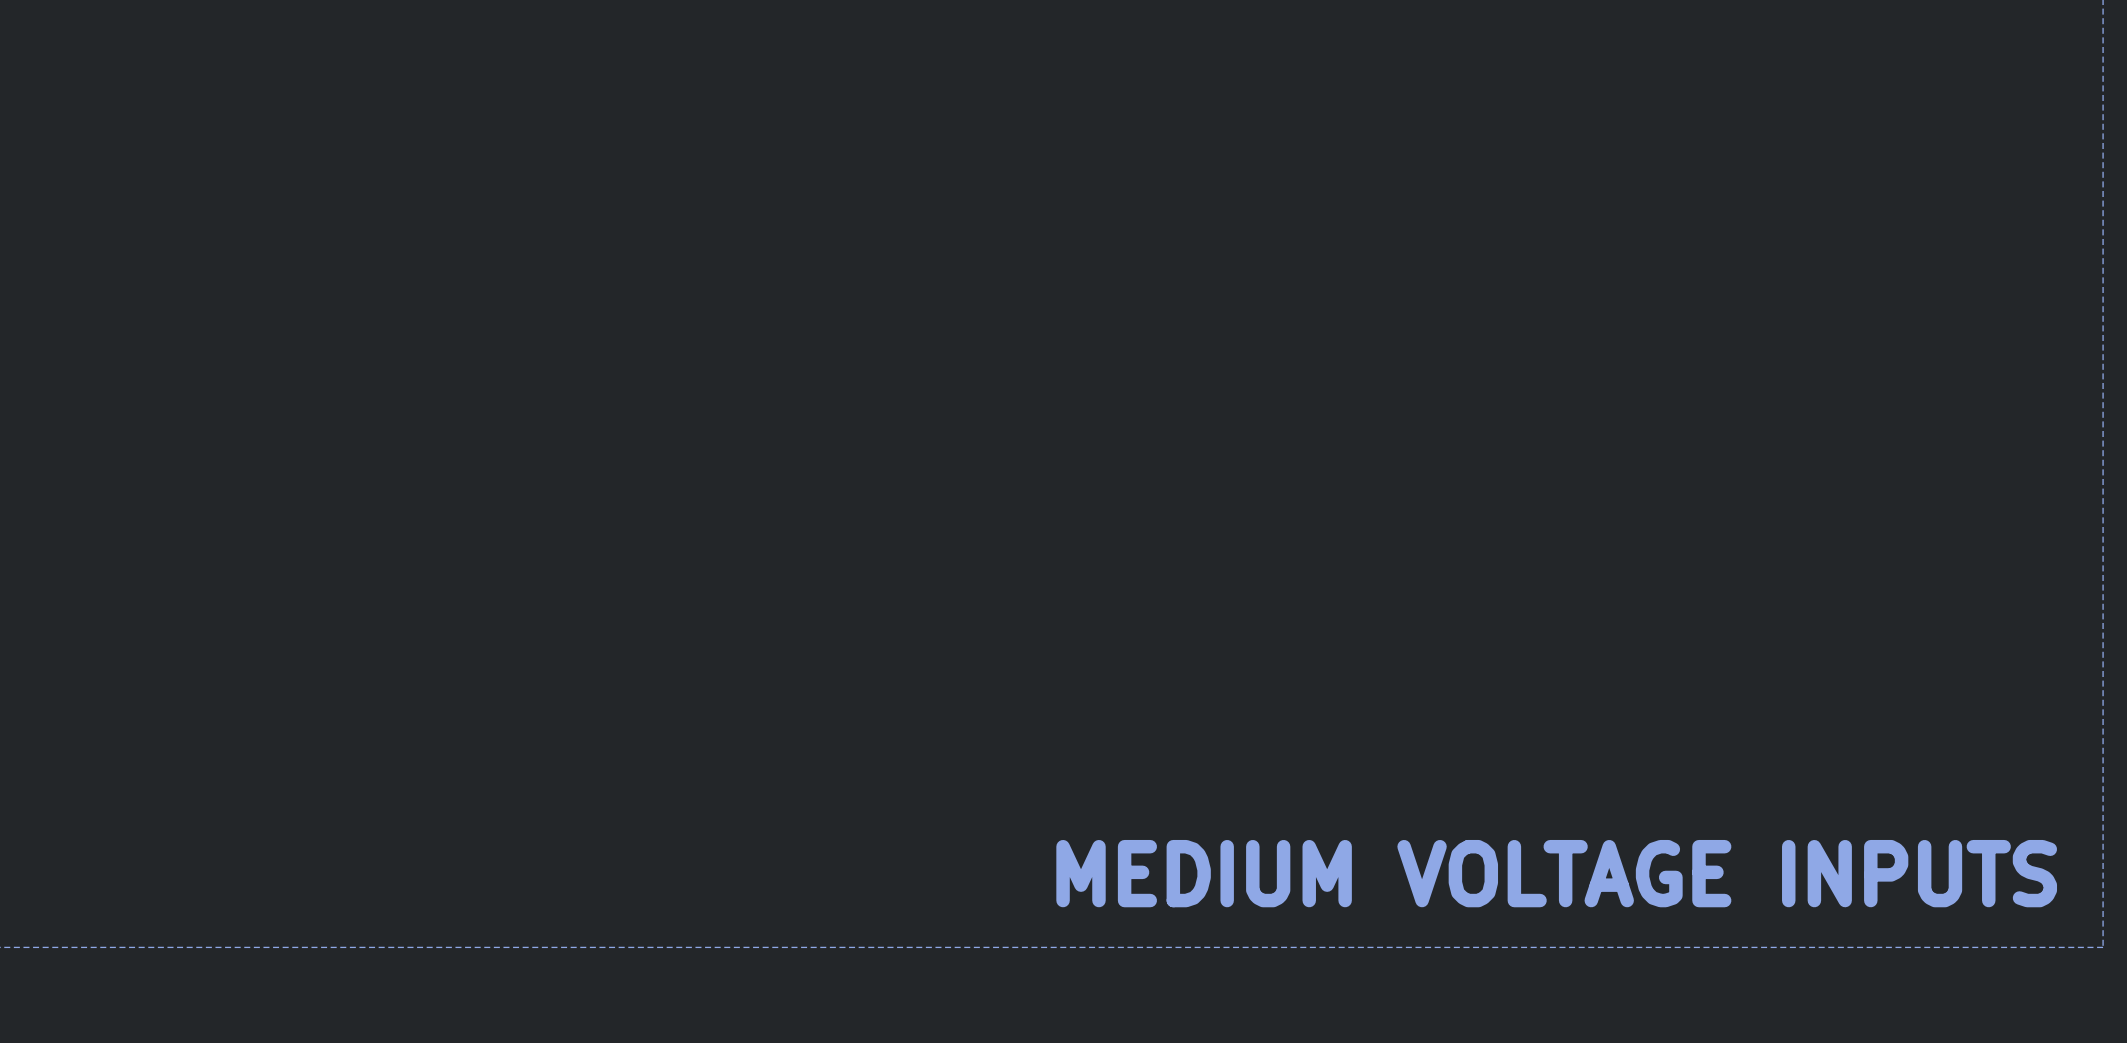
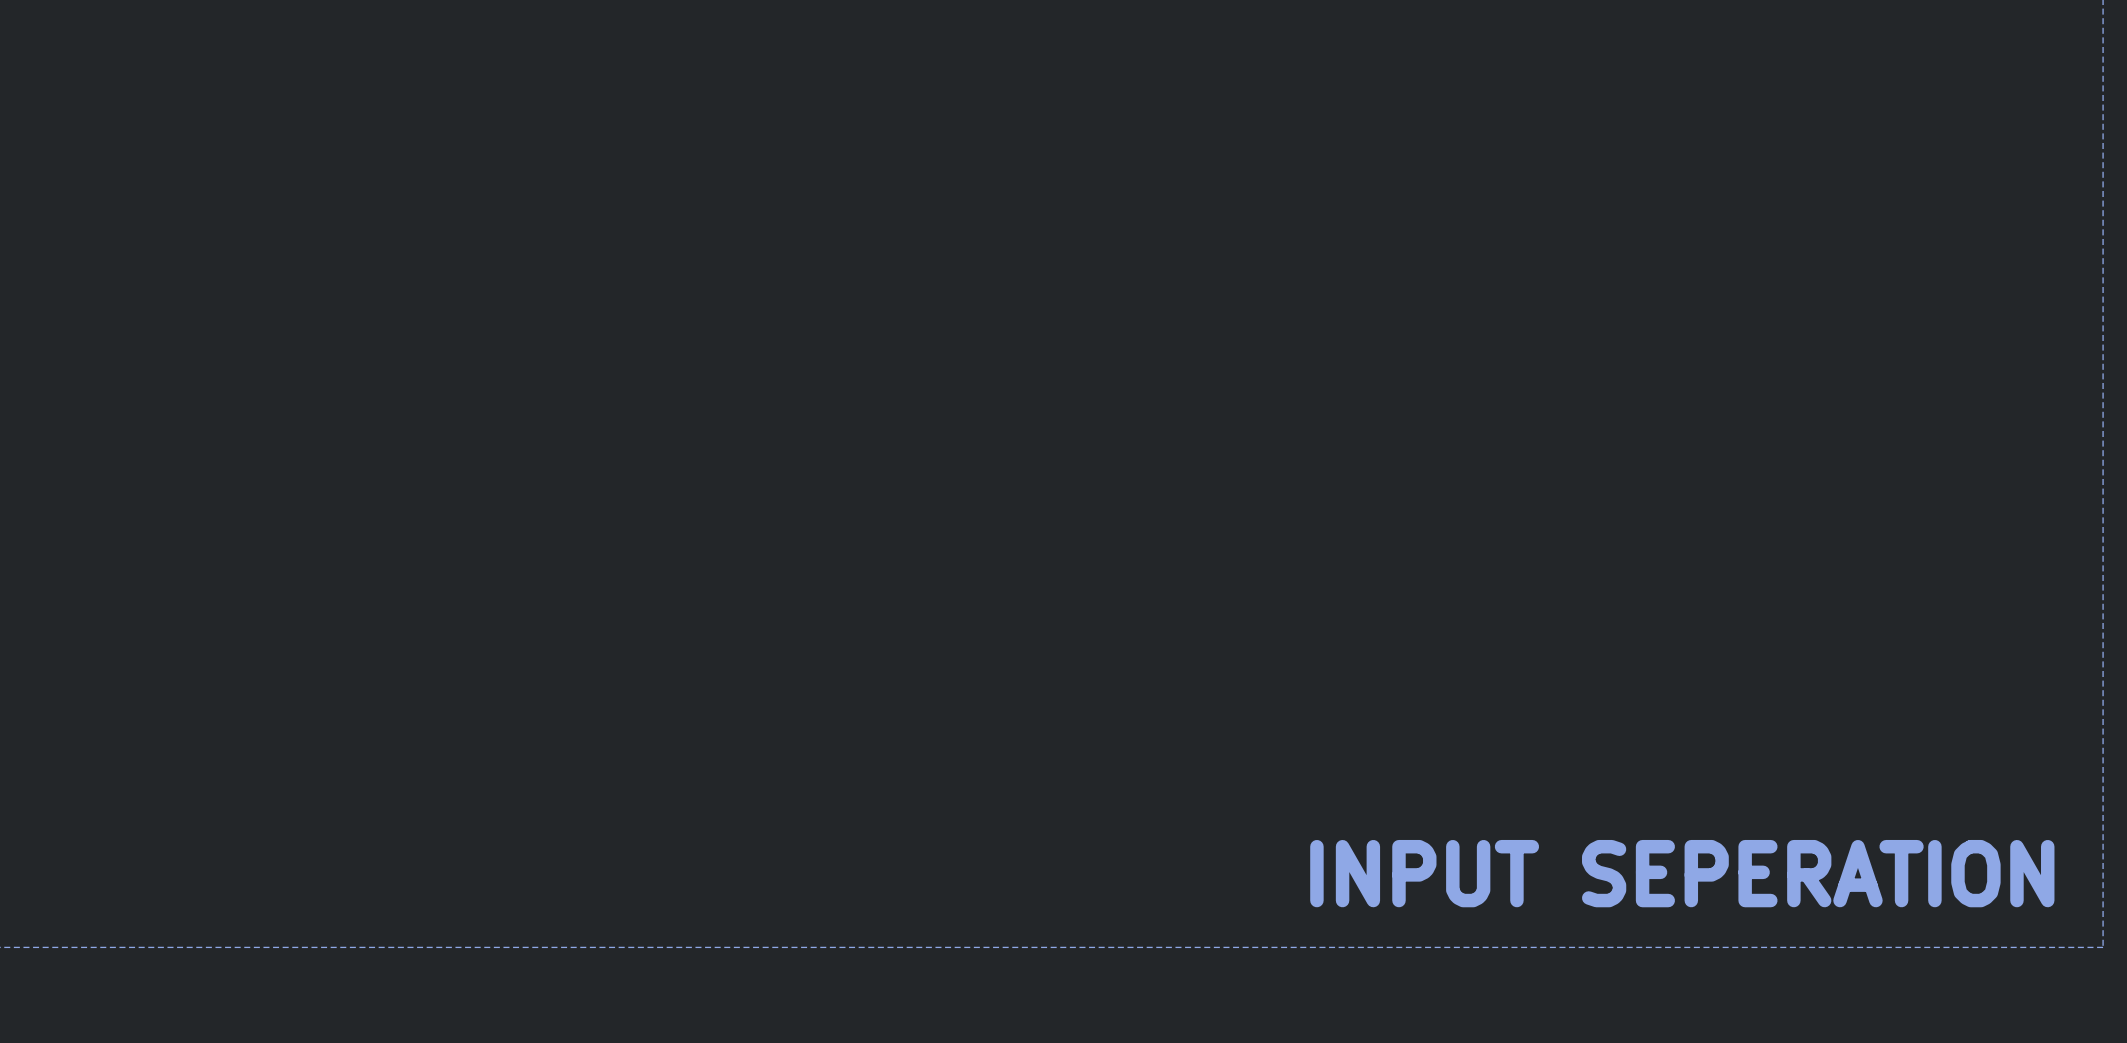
text: MEDIUM VOLTAGE INPUTS (1556, 873) -> INPUT SEPERATION (1682, 873)

